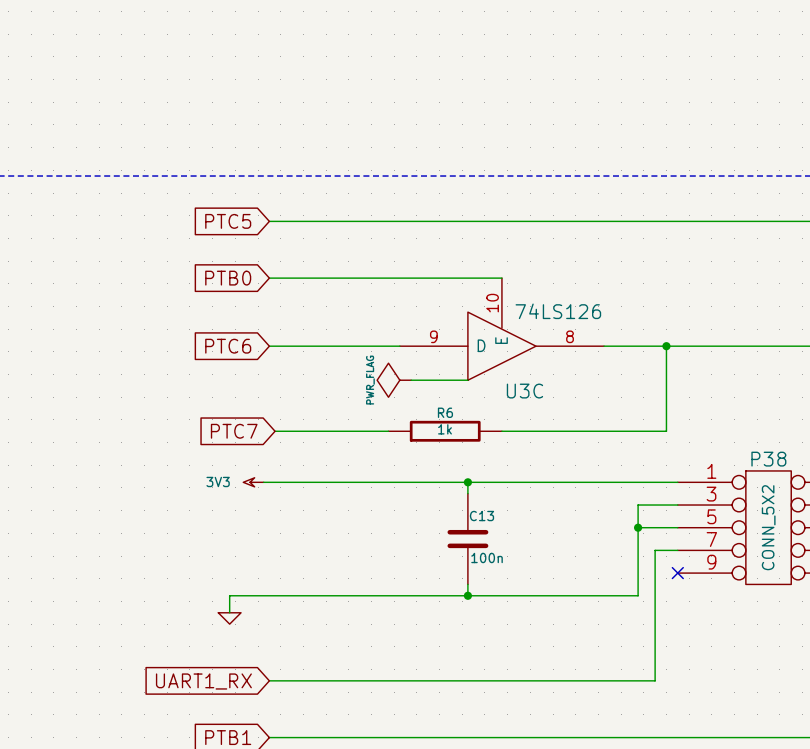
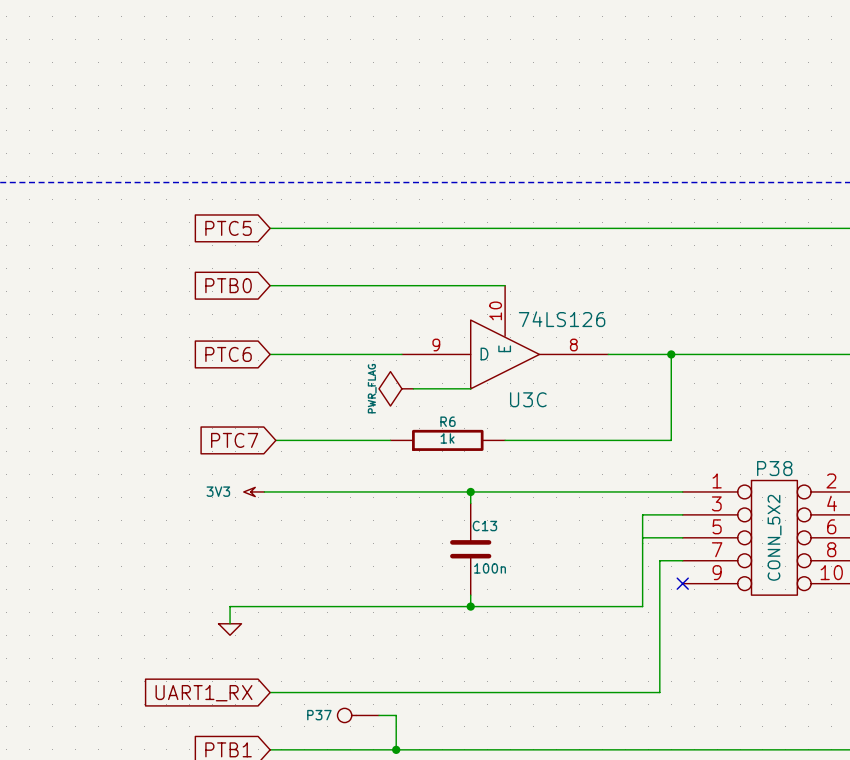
junction: (638, 527) -> none
P37: none -> (358, 715)
wire: none -> (379, 715) (396, 715) (396, 749)
junction: none -> (396, 749)

